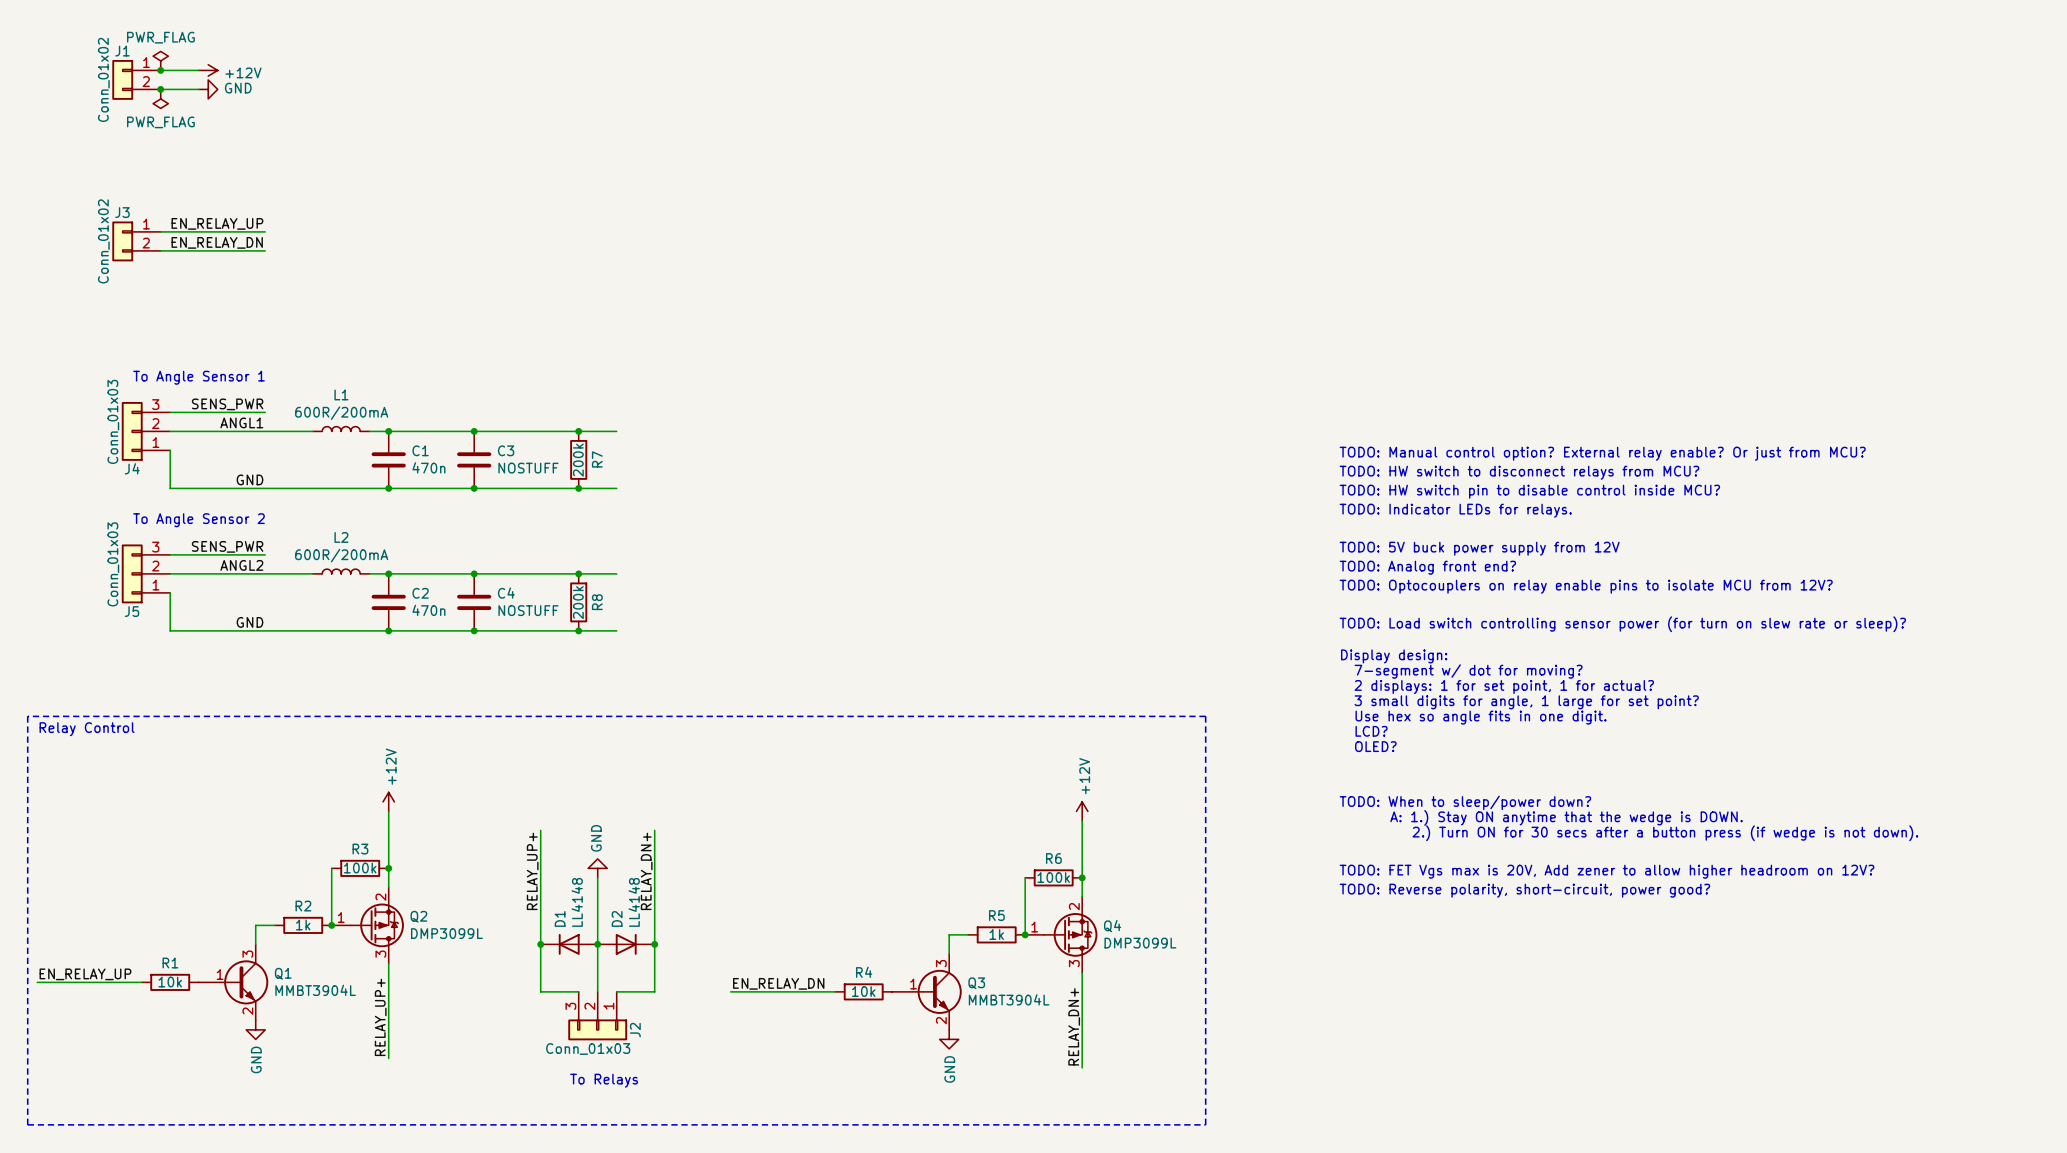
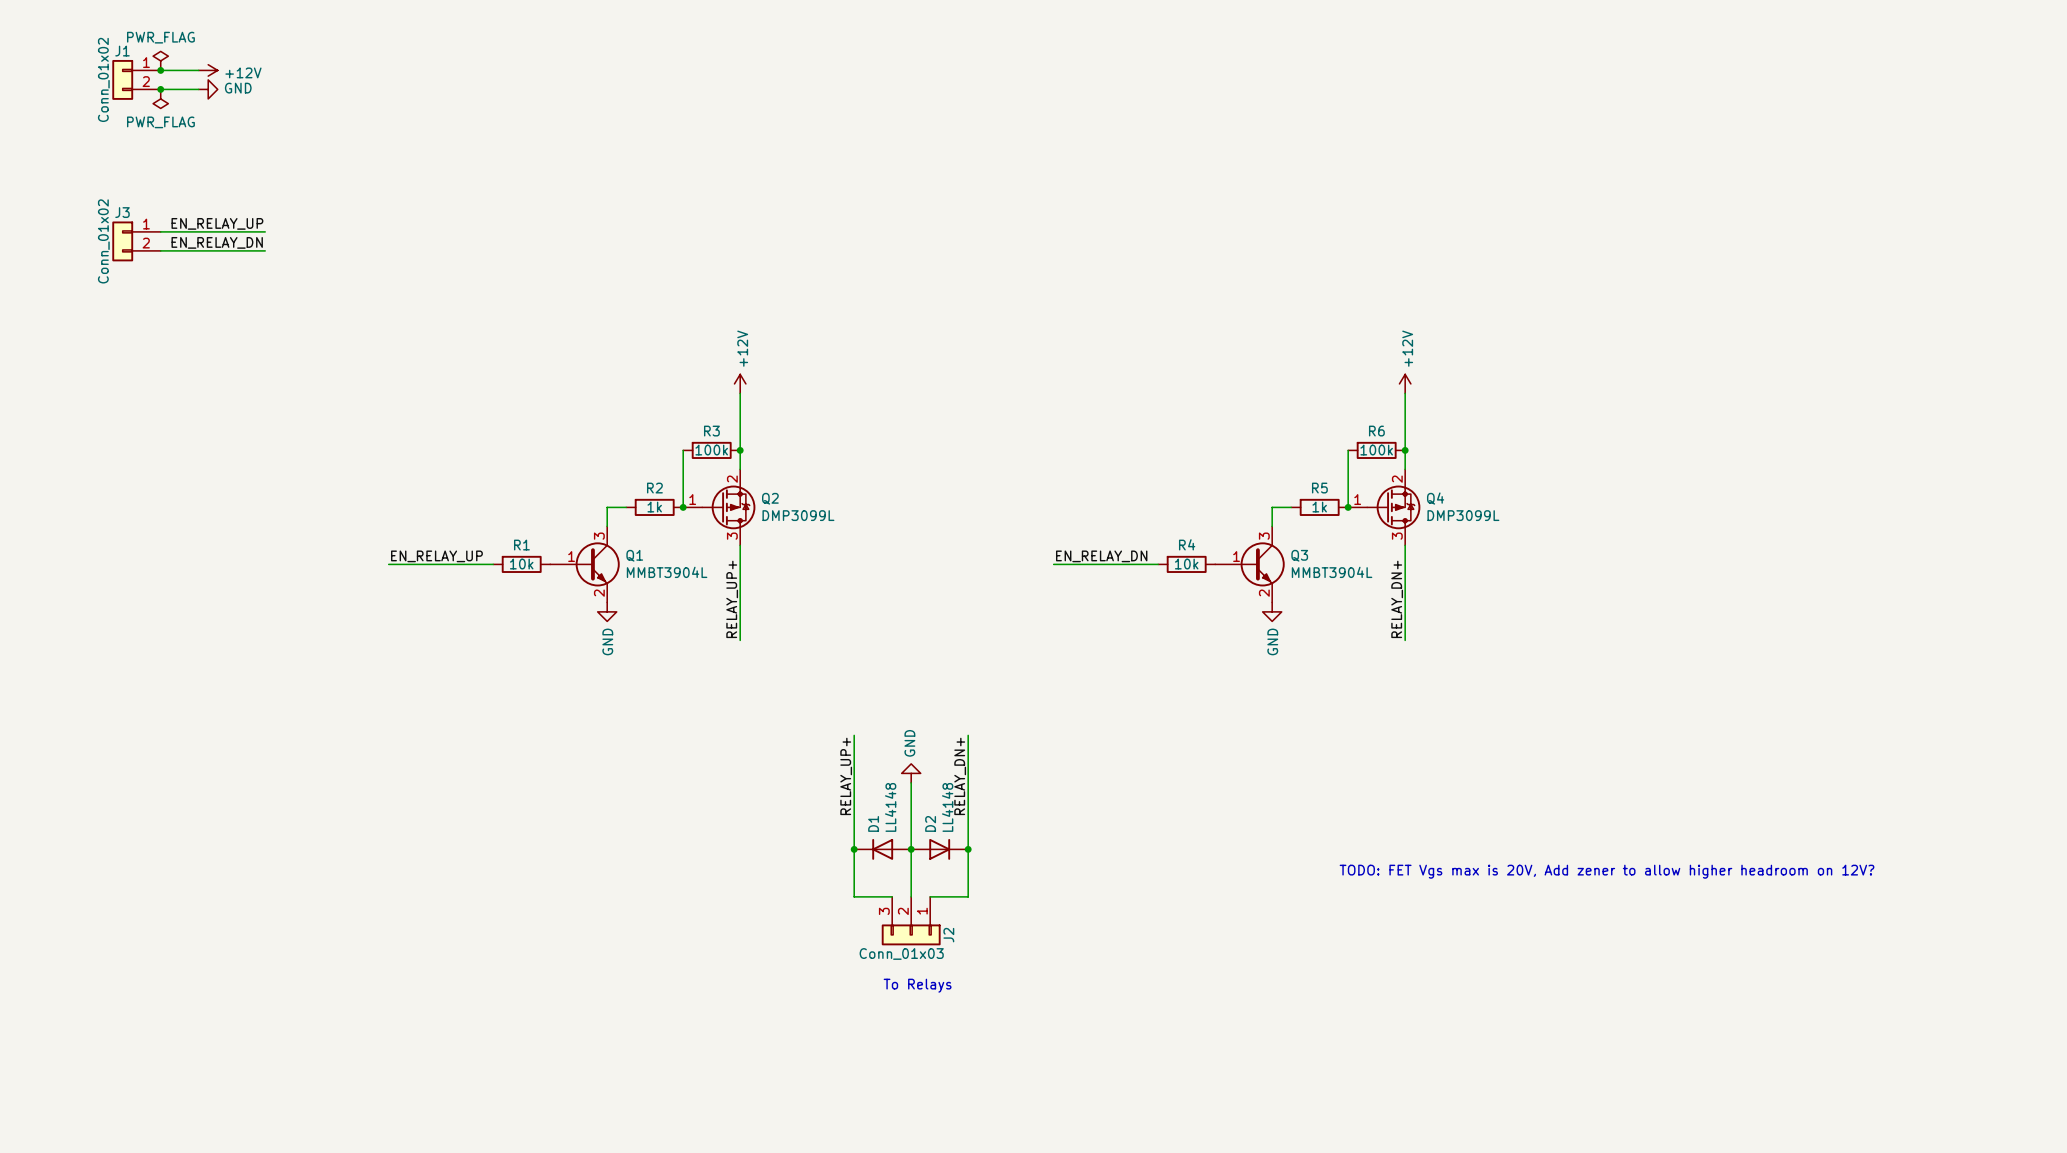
text: To Angle Sensor 1 (199, 377) -> none
power symbol: none -> +12V (740, 383)
power symbol: none -> +12V (1405, 383)
wire: none -> (740, 393) (740, 469)
wire: none -> (1405, 393) (1405, 469)
label: SENS_PWR (227, 404) -> none
wire: (170, 412) (265, 412) -> none
label: ANGL1 (241, 422) -> none
L1: 600R/200mA (341, 429) -> none
J4: Conn_01x03 (145, 431) -> none
wire: (170, 431) (312, 431) -> none
wire: (369, 431) (616, 431) -> none
junction: (388, 431) -> none
junction: (474, 431) -> none
junction: (578, 431) -> none
wire: (170, 450) (170, 488) (616, 488) -> none
wire: none -> (683, 450) (683, 507)
junction: none -> (740, 450)
wire: none -> (1348, 450) (1348, 507)
junction: none -> (1405, 450)
text: TODO: Manual control option? External relay enable? Or just from MCU? (1602, 453) -> none
C1: 470n (388, 459) -> none
C3: NOSTUFF (474, 459) -> none
R7: 200k (578, 459) -> none
text: TODO: HW switch to disconnect relays from MCU? (1519, 472) -> none
label: GND (249, 479) -> none
junction: (388, 488) -> none
junction: (474, 488) -> none
junction: (578, 488) -> none
text: TODO: HW switch pin to disable control inside MCU? (1529, 491) -> none
wire: none -> (626, 507) (607, 507) (607, 526)
junction: none -> (683, 507)
wire: none -> (1291, 507) (1272, 507) (1272, 526)
junction: none -> (1348, 507)
text: TODO: Indicator LEDs for relays. (1455, 510) -> none
text: To Angle Sensor 2 (199, 520) -> none
wire: none -> (740, 545) (740, 640)
wire: none -> (1405, 545) (1405, 640)
label: SENS_PWR (227, 546) -> none
text: TODO: 5V buck power supply from 12V (1479, 548) -> none
wire: (170, 554) (265, 554) -> none
label: none -> EN_RELAY_UP (436, 556)
label: none -> EN_RELAY_DN (1101, 556)
wire: none -> (388, 564) (493, 564)
wire: none -> (1053, 564) (1158, 564)
label: ANGL2 (241, 565) -> none
text: TODO: Analog front end? (1427, 567) -> none
L2: 600R/200mA (341, 571) -> none
J5: Conn_01x03 (145, 573) -> none
wire: (170, 573) (312, 573) -> none
wire: (369, 573) (616, 573) -> none
junction: (388, 573) -> none
junction: (474, 573) -> none
junction: (578, 573) -> none
text: TODO: Optocouplers on relay enable pins to isolate MCU from 12V? (1586, 586) -> none
wire: (170, 592) (170, 630) (616, 630) -> none
label: none -> RELAY_UP+ (732, 599)
label: none -> RELAY_DN+ (1397, 599)
C2: 470n (388, 602) -> none
C4: NOSTUFF (474, 602) -> none
R8: 200k (578, 602) -> none
power symbol: none -> GND (607, 611)
power symbol: none -> GND (1272, 611)
label: GND (249, 622) -> none
text: TODO: Load switch controlling sensor power (for turn on slew rate or sleep)? (1622, 624) -> none
junction: (388, 630) -> none
junction: (474, 630) -> none
junction: (578, 630) -> none
text: Display design: (1394, 656) -> none
text: 7-segment w/ dot for moving? (1468, 671) -> none
text: 2 displays: 1 for set point, 1 for actual? (1504, 687) -> none
text: 3 small digits for angle, 1 large for set point? (1526, 702) -> none
line: (27, 716) (1205, 716) (1205, 1124) (27, 1124) (27, 716) -> none
text: Use hex so angle fits in one digit. (1481, 717) -> none
text: Relay Control (87, 729) -> none
text: LCD? (1371, 731) -> none
wire: none -> (854, 735) (854, 896) (892, 896)
wire: none -> (968, 735) (968, 896) (930, 896)
text: OLED? (1375, 746) -> none
power symbol: none -> GND (911, 773)
label: none -> RELAY_UP+ (846, 776)
label: none -> RELAY_DN+ (960, 776)
wire: none -> (911, 782) (911, 896)
power symbol: +12V (388, 801) -> none
text: TODO: When to sleep/power down? (1465, 802) -> none
wire: (388, 811) (388, 887) -> none
power symbol: +12V (1082, 811) -> none
text: A: 1.) Stay ON anytime that the wedge is DOWN. (1566, 817) -> none
wire: (1082, 820) (1082, 896) -> none
wire: (540, 830) (540, 991) (578, 991) -> none
wire: (654, 830) (654, 991) (616, 991) -> none
text: 2.) Turn ON for 30 secs after a button press (if wedge is not down). (1665, 833) -> none
junction: none -> (854, 849)
junction: none -> (911, 849)
junction: none -> (968, 849)
wire: (331, 868) (331, 925) -> none
R3 position: (360, 868) -> (711, 450)
junction: (388, 868) -> none
power symbol: GND (597, 868) -> none
label: RELAY_UP+ (532, 871) -> none
label: RELAY_DN+ (646, 871) -> none
wire: (597, 877) (597, 991) -> none
wire: (1025, 877) (1025, 934) -> none
R6 position: (1053, 877) -> (1376, 450)
junction: (1082, 877) -> none
text: TODO: Reverse polarity, short-circuit, power good? (1524, 890) -> none
wire: (274, 925) (255, 925) (255, 944) -> none
R2 position: (303, 925) -> (654, 507)
junction: (331, 925) -> none
Q2 position: (367, 925) -> (719, 507)
wire: (968, 934) (949, 934) (949, 953) -> none
R5 position: (996, 934) -> (1319, 507)
junction: (1025, 934) -> none
Q4 position: (1061, 934) -> (1384, 507)
junction: (540, 944) -> none
D1 position: (569, 944) -> (882, 849)
junction: (597, 944) -> none
D2 position: (626, 944) -> (939, 849)
junction: (654, 944) -> none
wire: (388, 963) (388, 1058) -> none
wire: (1082, 972) (1082, 1067) -> none
label: EN_RELAY_UP (85, 974) -> none
wire: (37, 982) (141, 982) -> none
R1 position: (170, 982) -> (521, 564)
Q1 position: (233, 982) -> (584, 564)
label: EN_RELAY_DN (778, 983) -> none
text: none -> To Relays (917, 985)
wire: (730, 991) (835, 991) -> none
R4 position: (863, 991) -> (1186, 564)
Q3 position: (926, 991) -> (1249, 564)
J2 position: (597, 1016) -> (911, 921)
label: RELAY_UP+ (380, 1017) -> none
label: RELAY_DN+ (1074, 1026) -> none
power symbol: GND (255, 1029) -> none
power symbol: GND (949, 1039) -> none
text: To Relays (604, 1080) -> none

